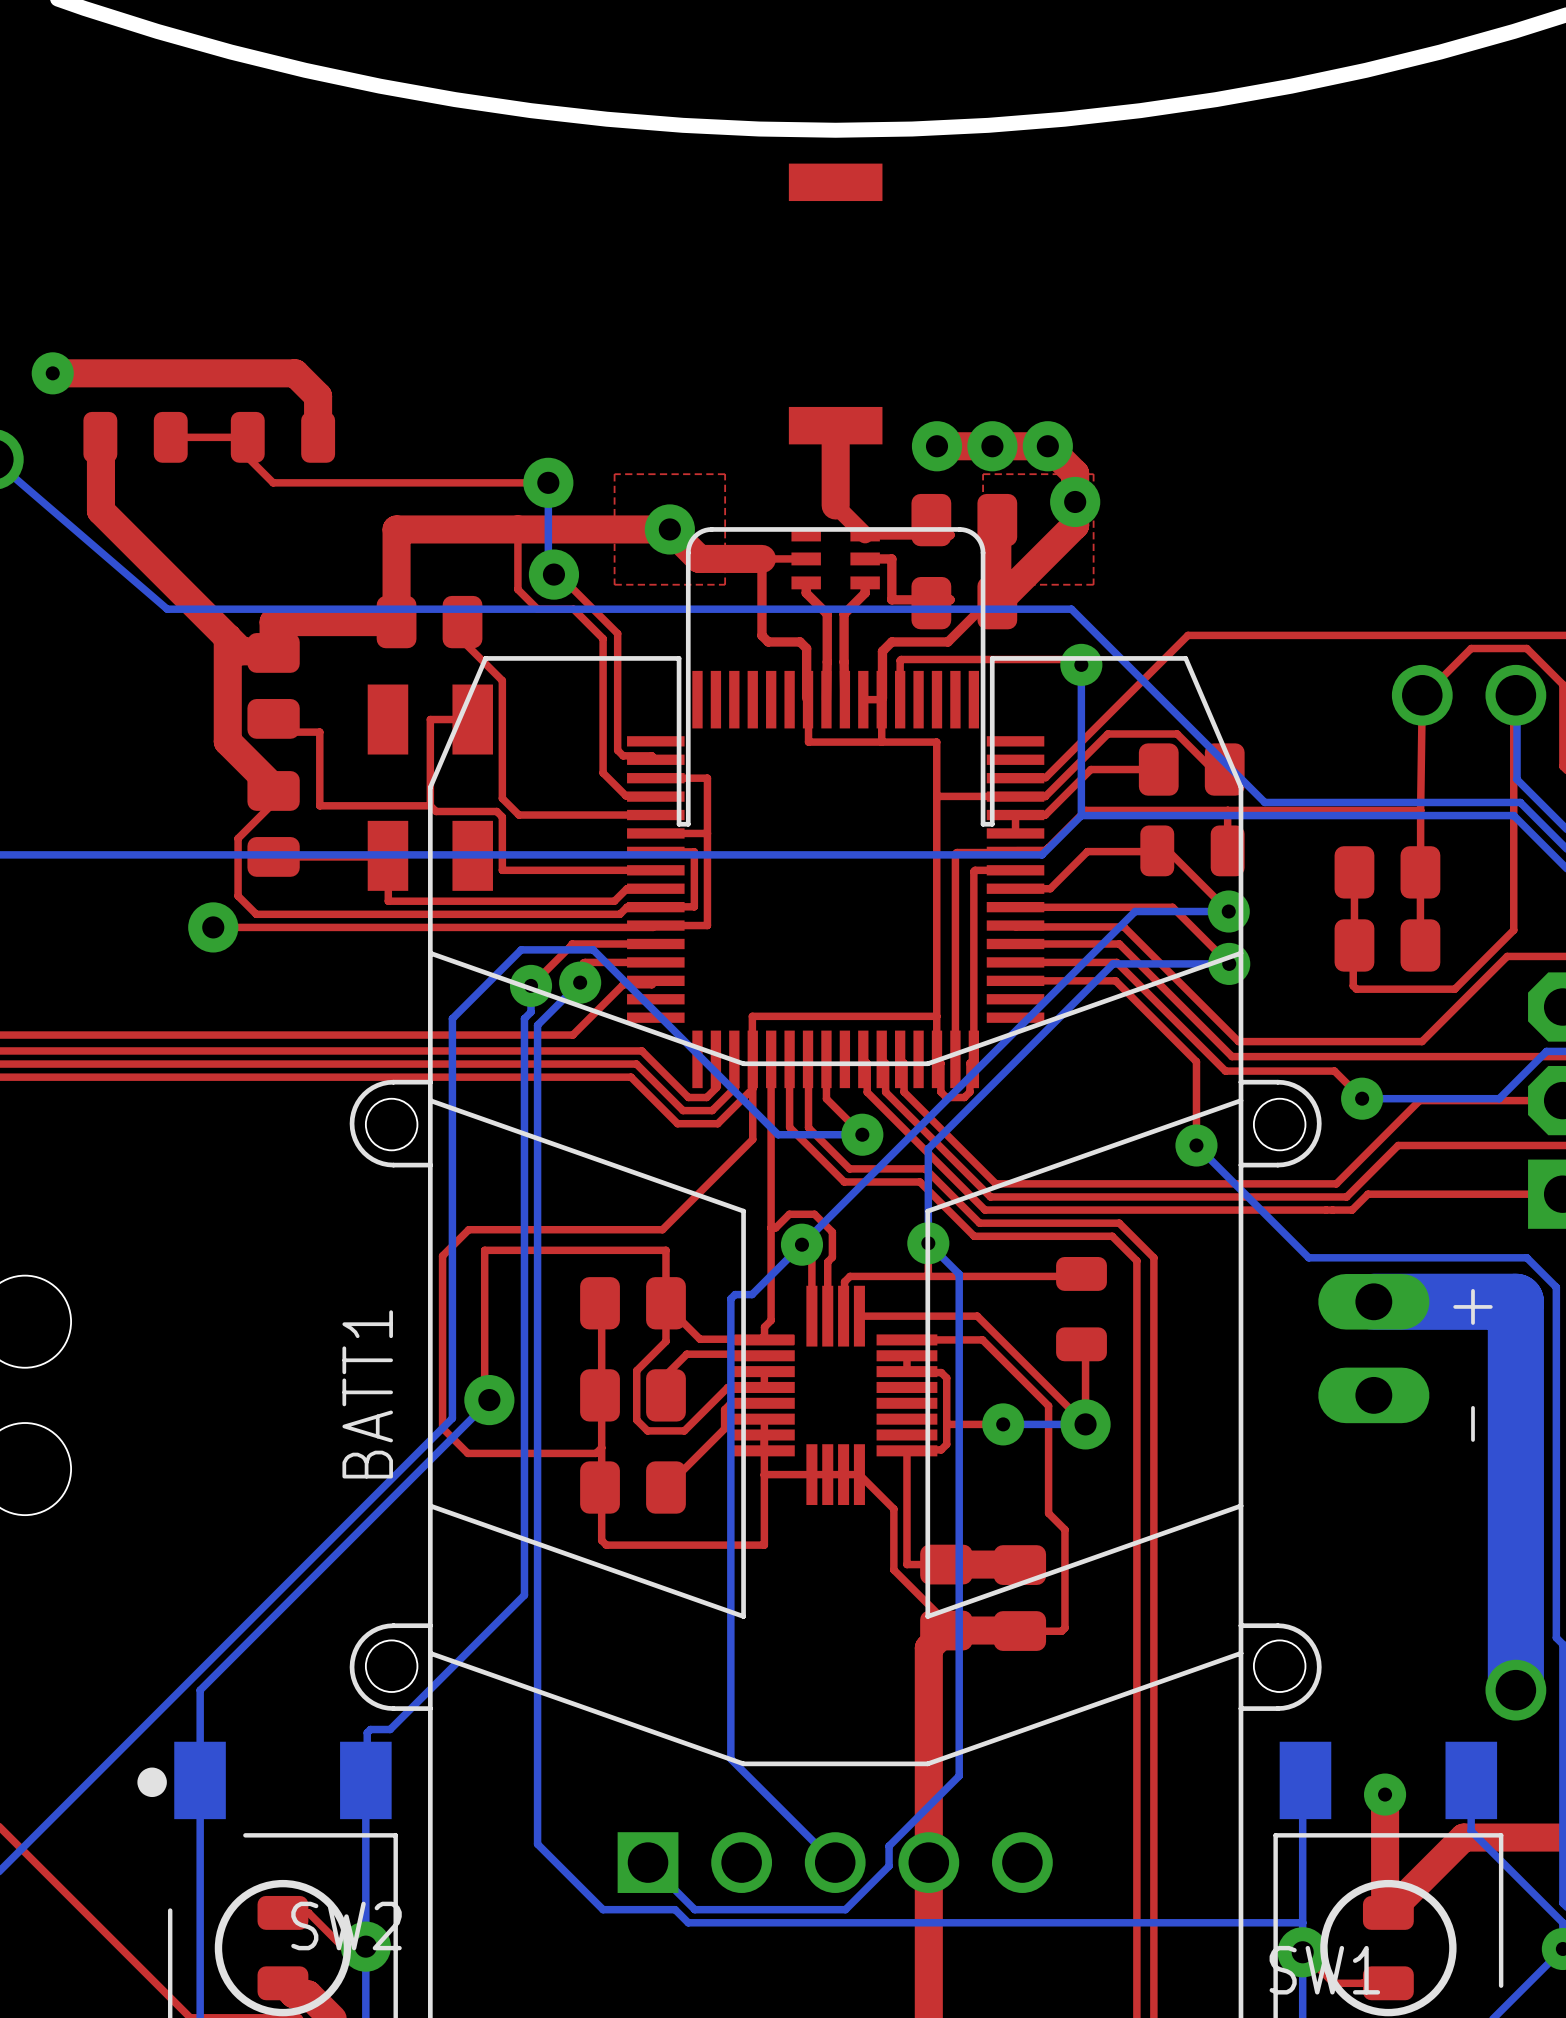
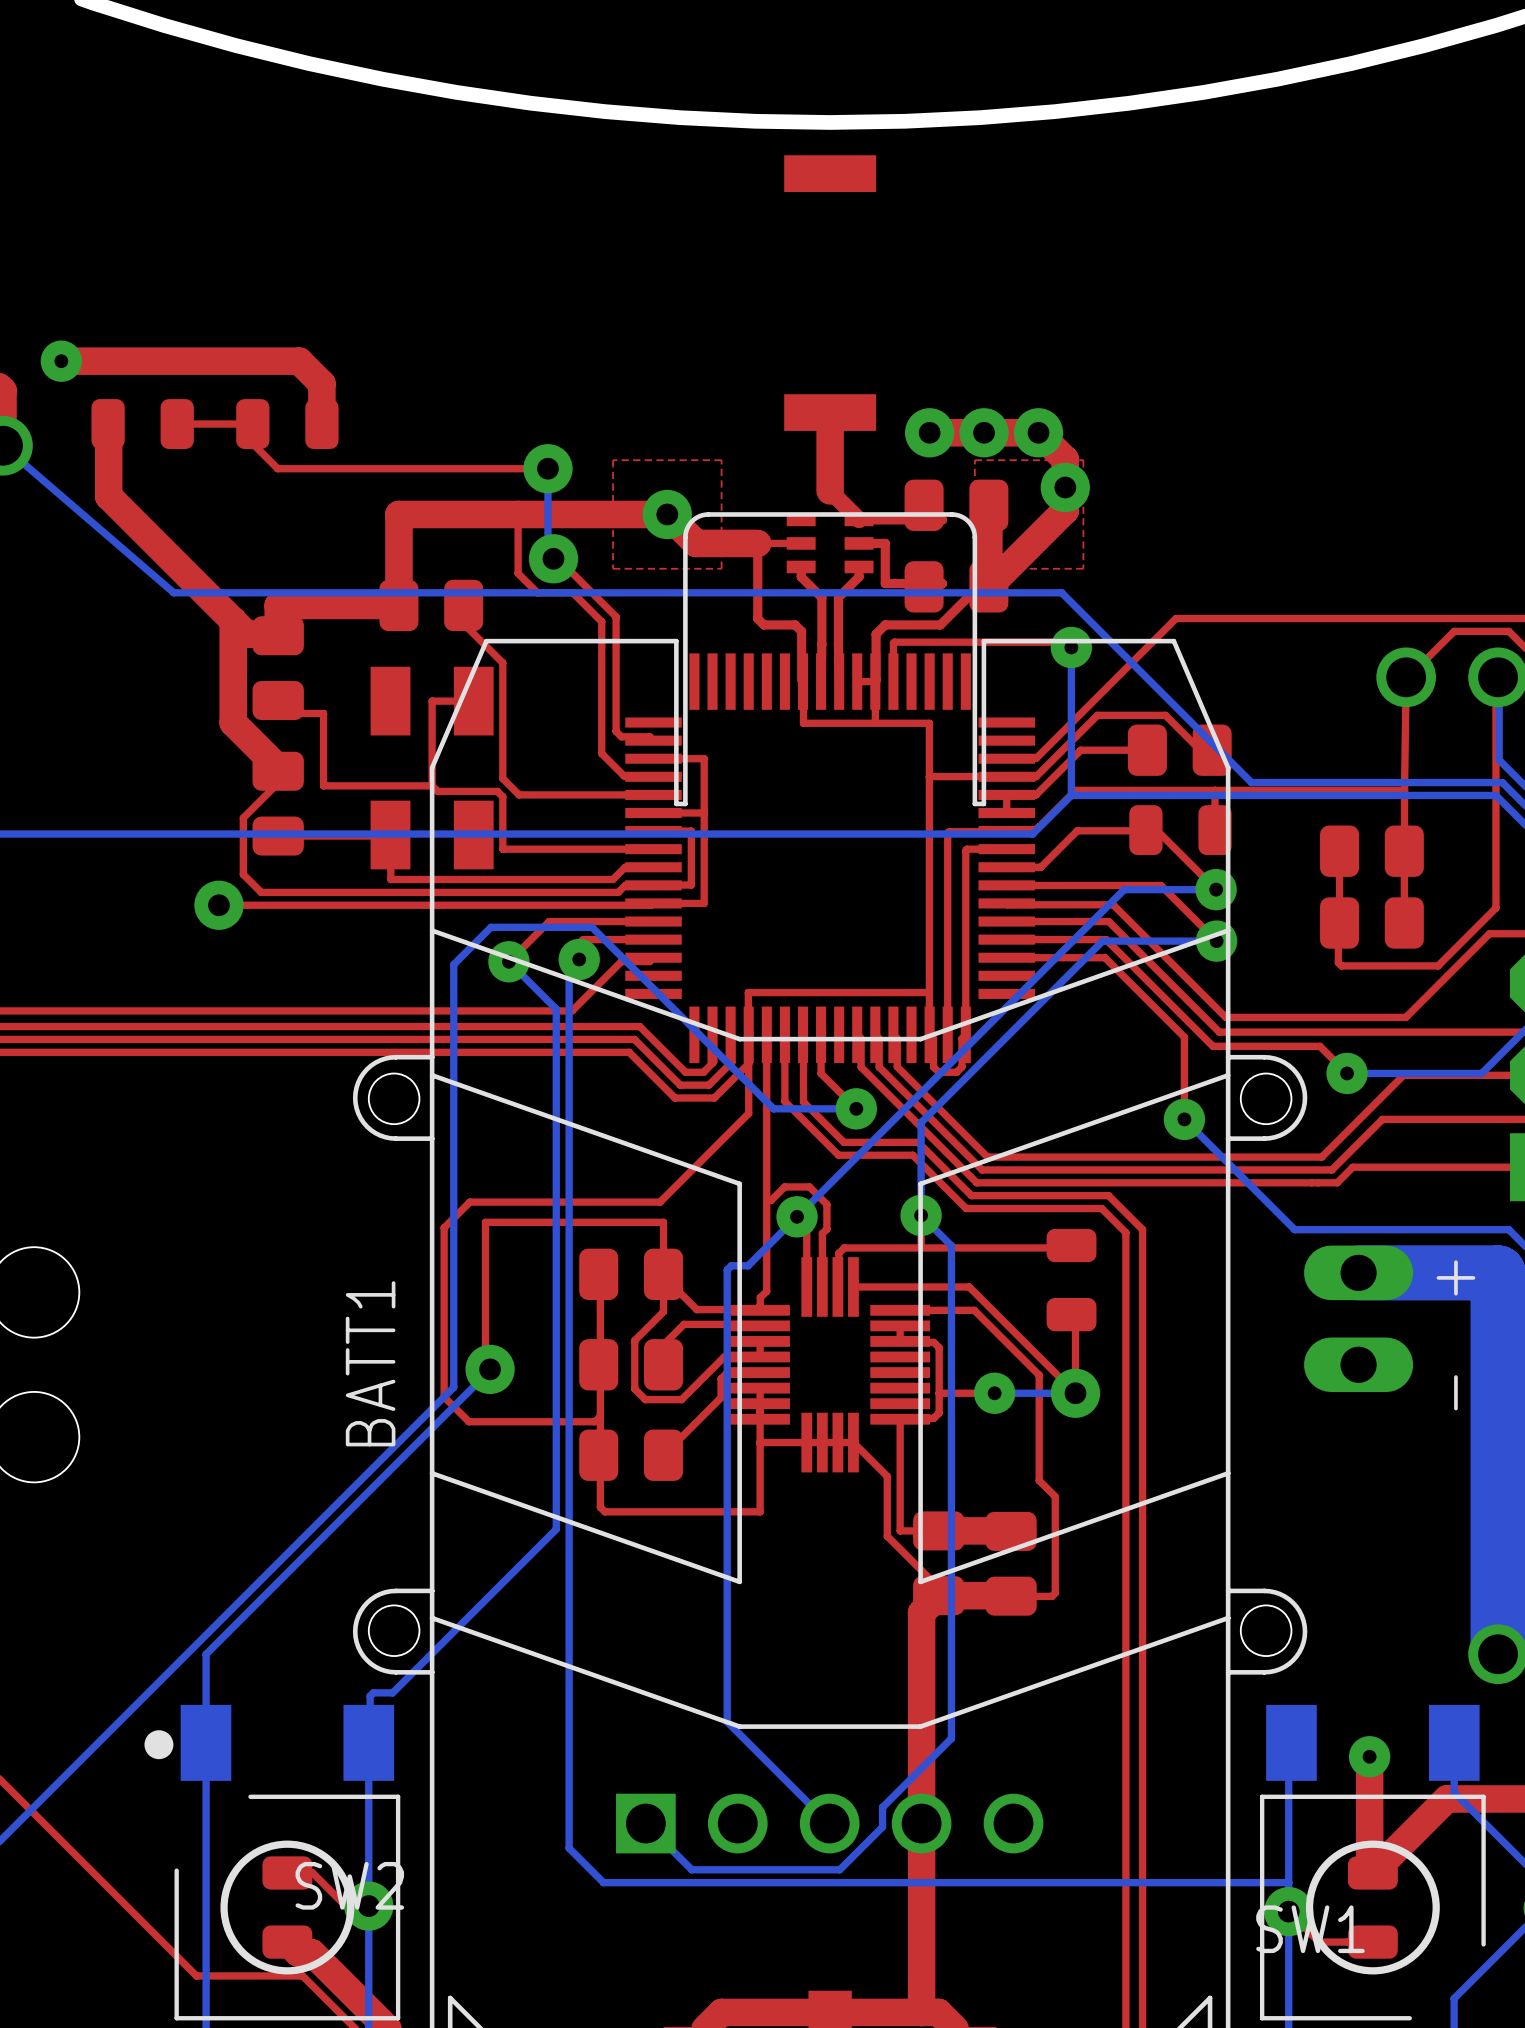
top track: (572, 944) (531, 985) -> (571, 921) (549, 921) (508, 961)
bottom track: (521, 949) (452, 1018) -> (521, 927) (491, 927) (453, 964) (453, 994)
bottom track: (580, 982) (537, 1025) (537, 1844) (603, 1909) (675, 1909) (688, 1922) -> (569, 961) (569, 1848) (603, 1882) (685, 1882)
bottom track: (531, 985) (531, 1012) (524, 1018) (524, 1595) -> (508, 961) (556, 1009) (556, 1529) (524, 1560)
via position: (531, 985) -> (508, 961)

